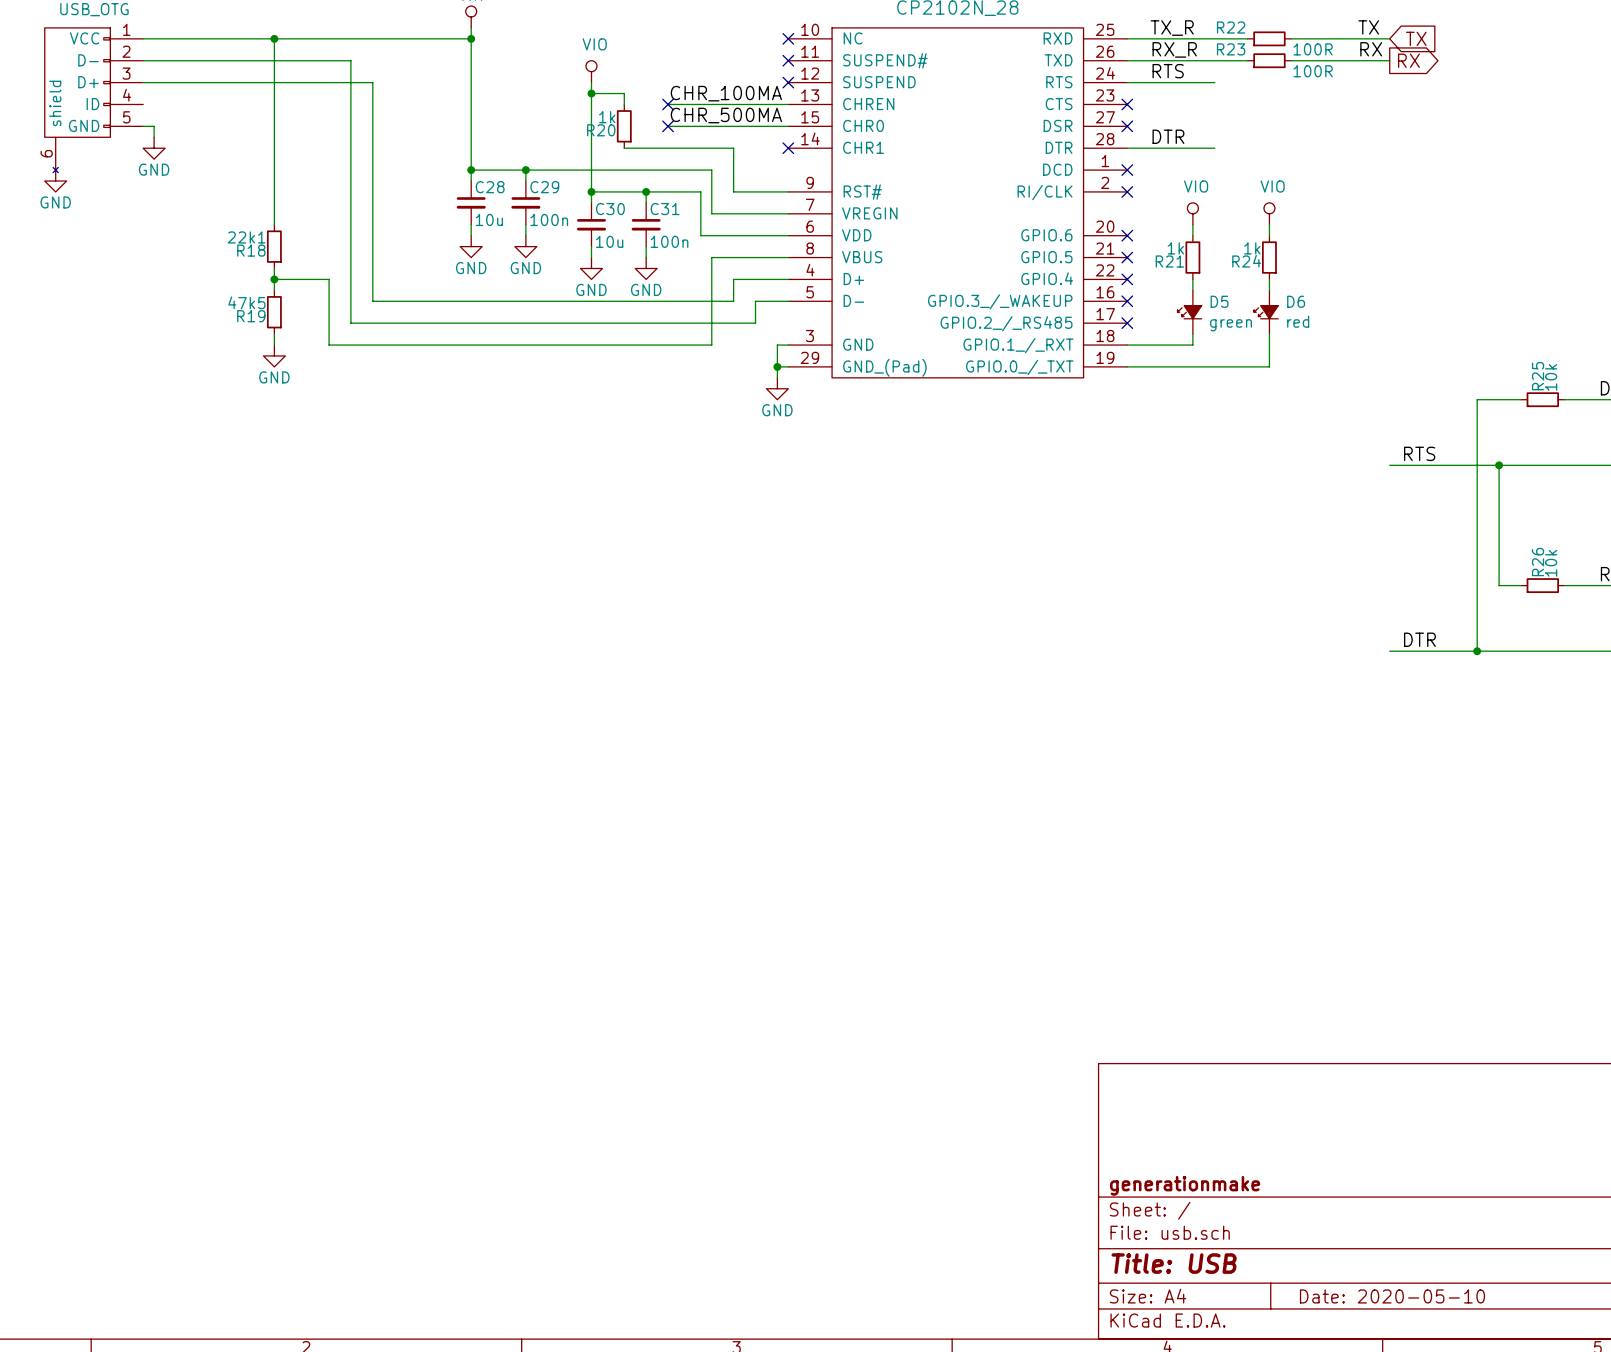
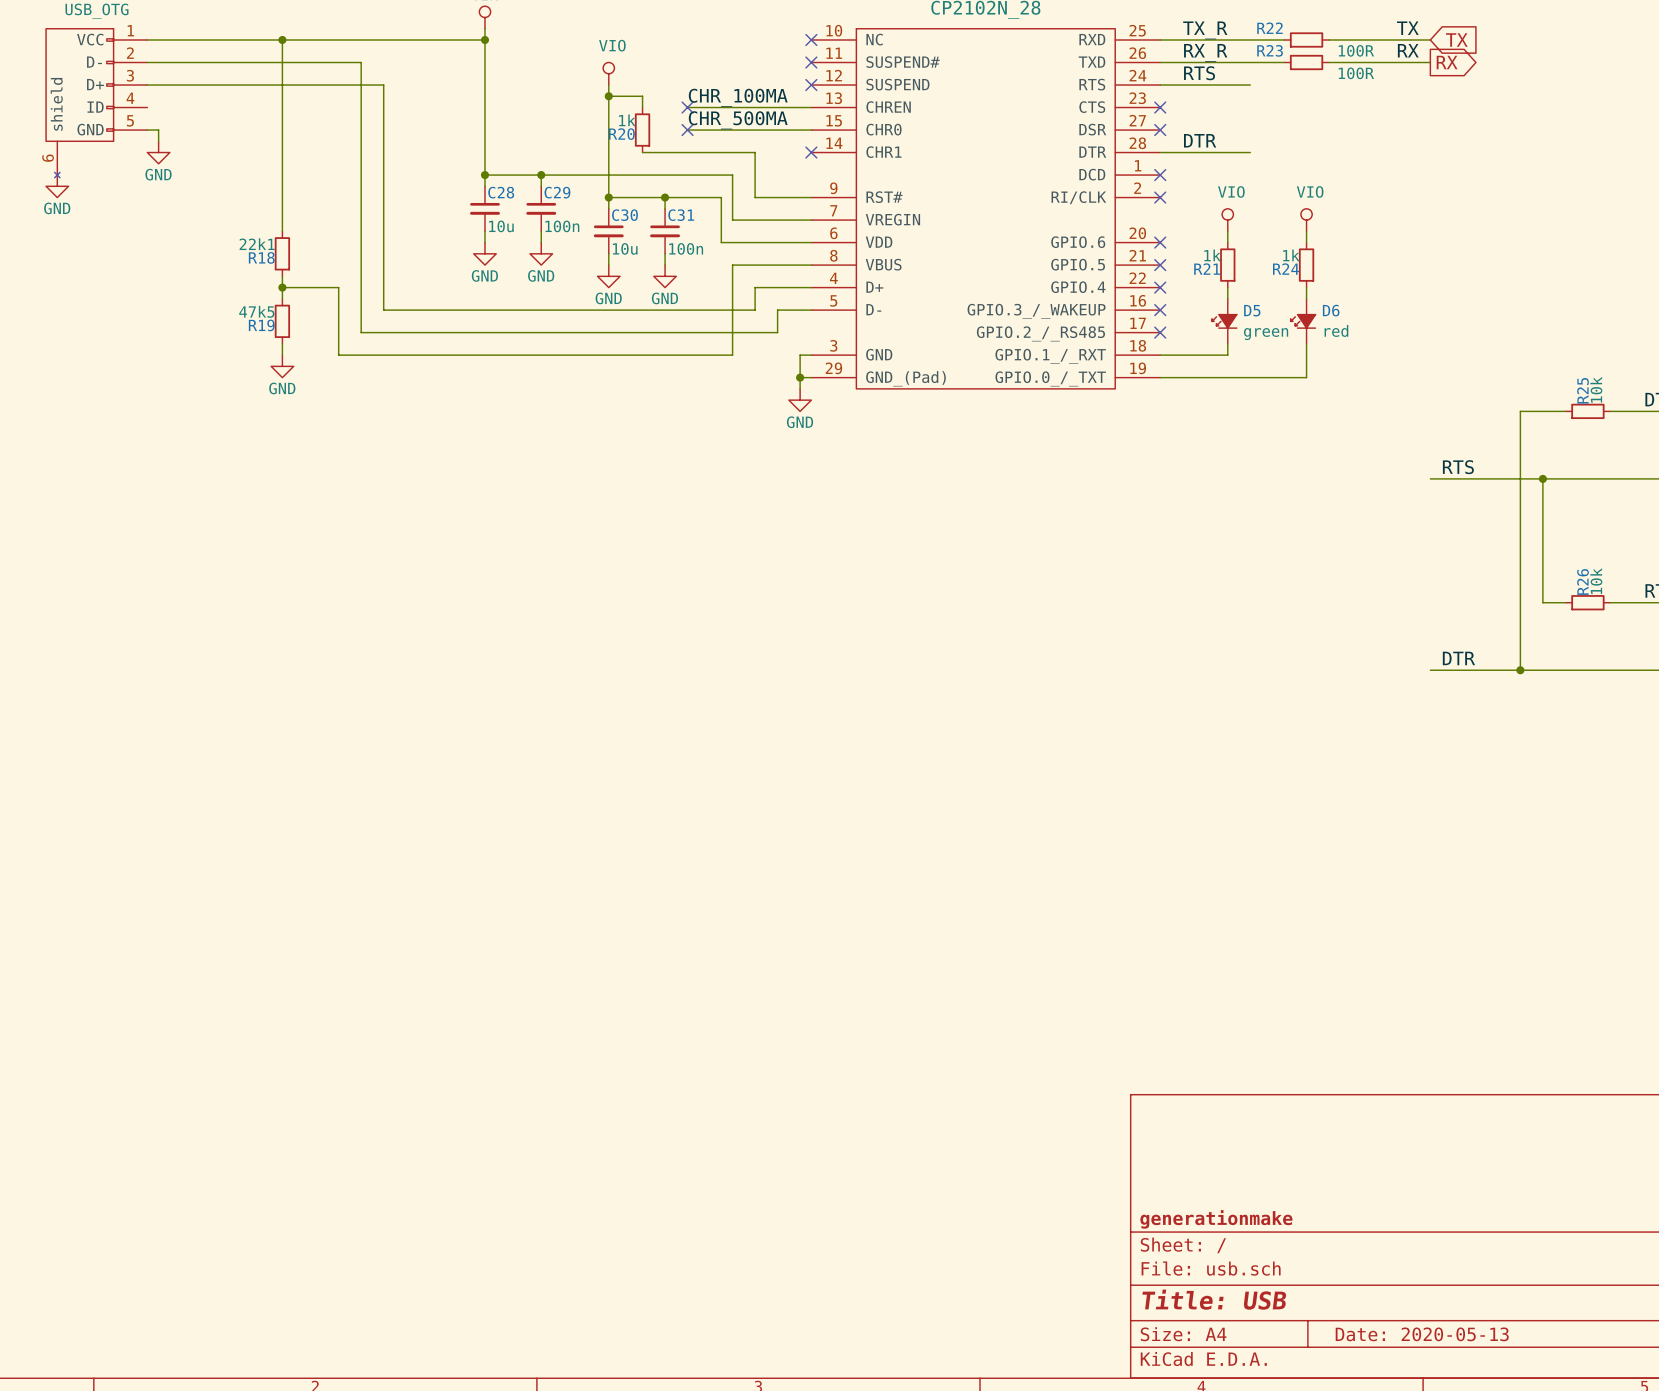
title block: Date: 2020-05-10 (1392, 1296) -> Date: 2020-05-13 (1422, 1334)

